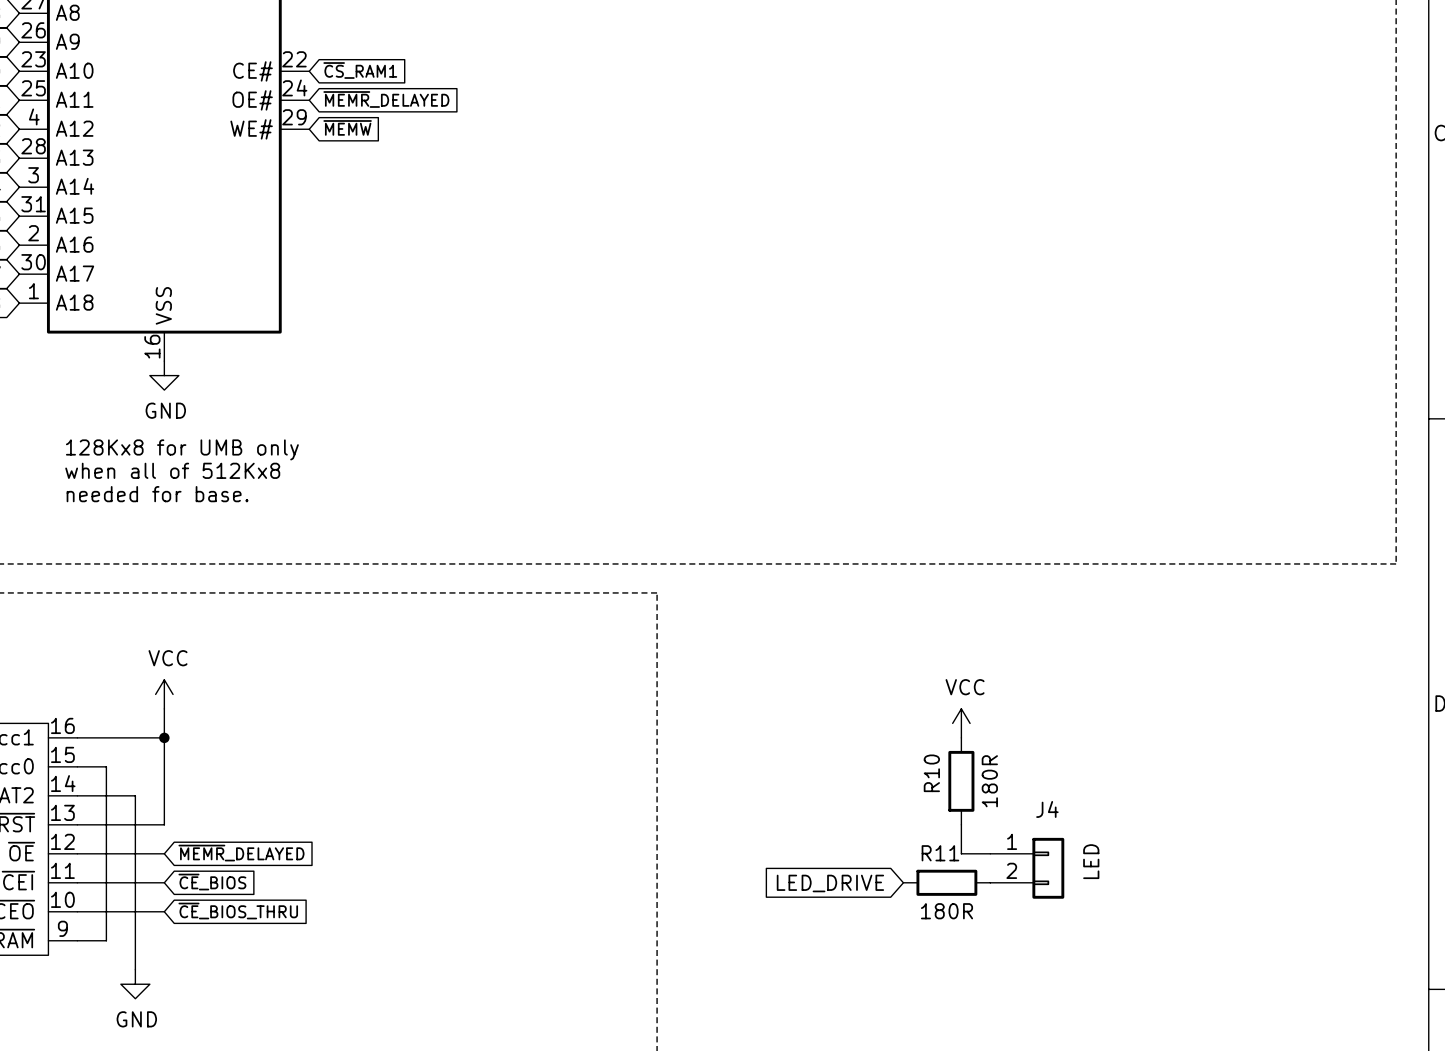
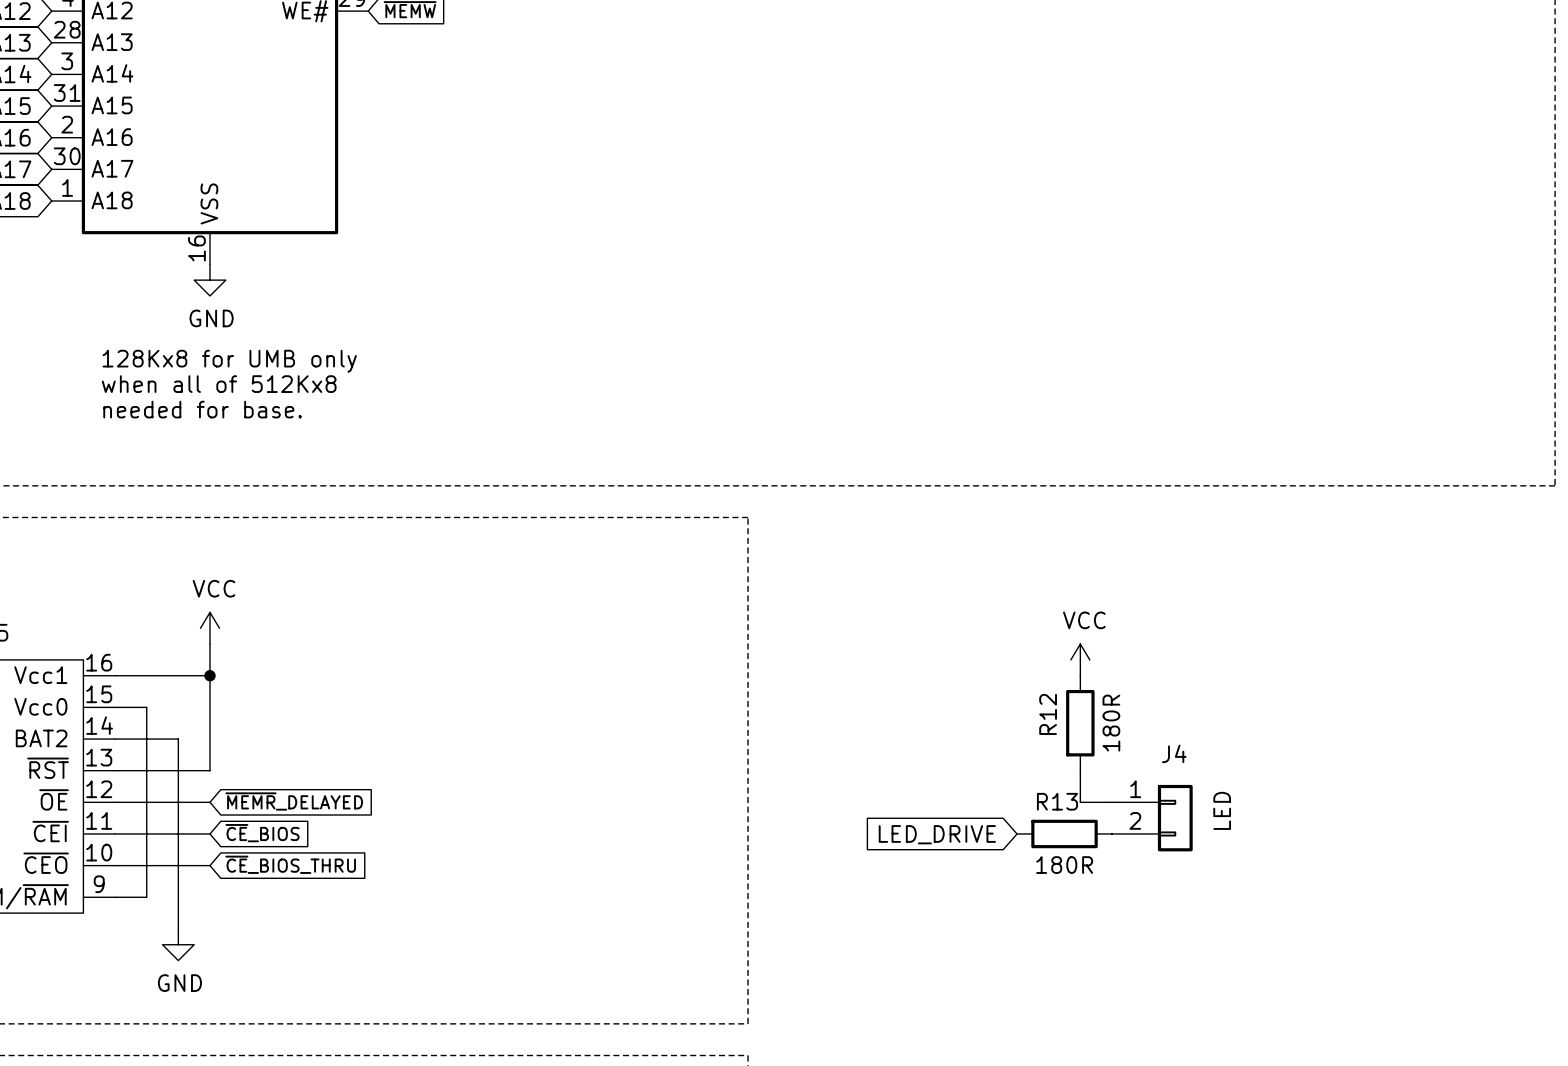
R10 name: R10 (931, 773) -> R12 (1048, 714)
R11 name: R11 (940, 853) -> R13 (1057, 801)

